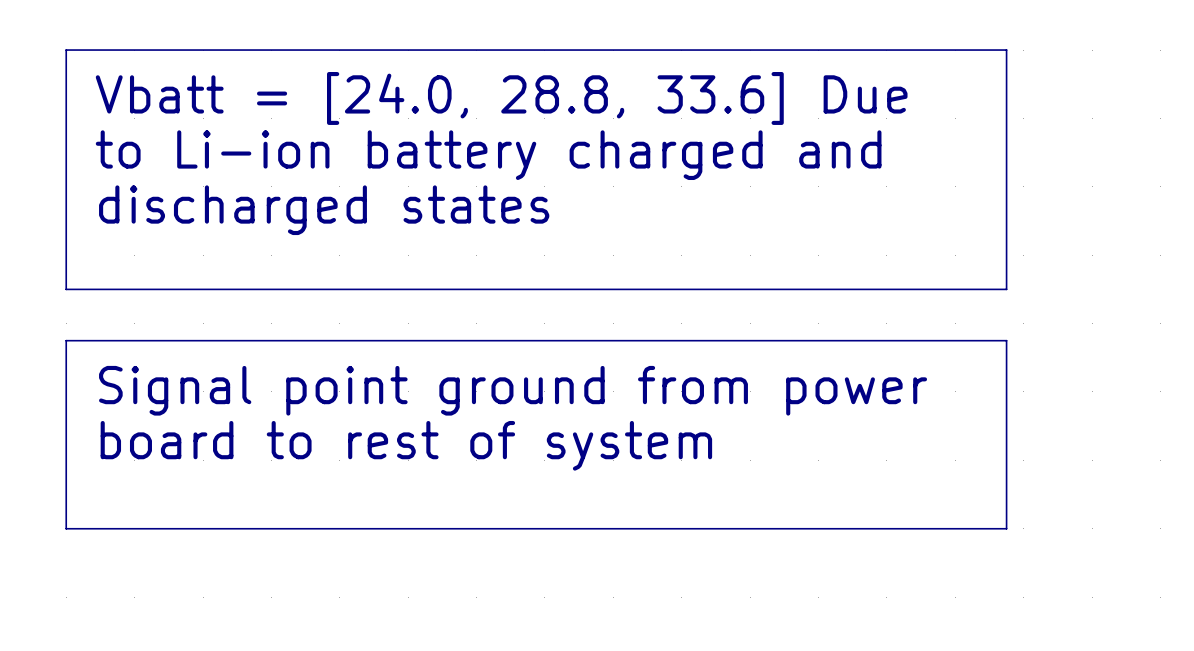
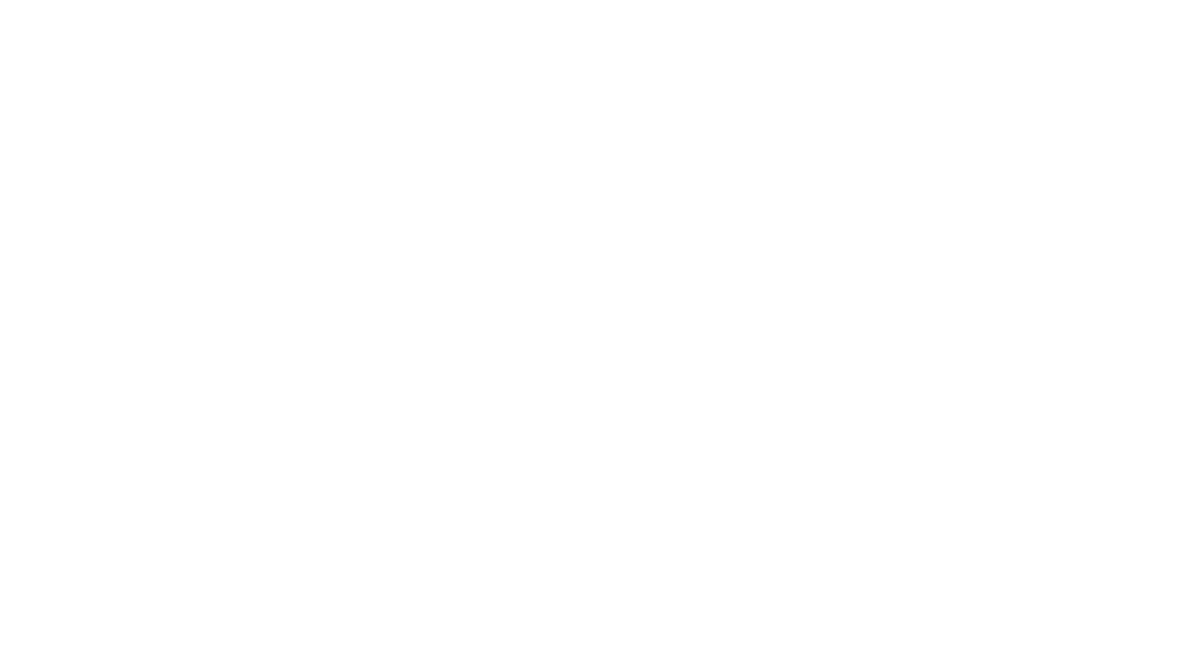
line: (66, 50) (66, 289) (1006, 289) (1006, 50) (66, 50) -> none
text: Vbatt = [24.0, 28.8, 33.6] Due (501, 98) -> none
text: to Li-ion battery charged and (488, 155) -> none
text: discharged states (324, 210) -> none
line: (66, 340) (1006, 340) (1006, 528) (66, 528) (66, 340) -> none
text: Signal point ground from power (513, 390) -> none
text: board to rest of system (406, 445) -> none

